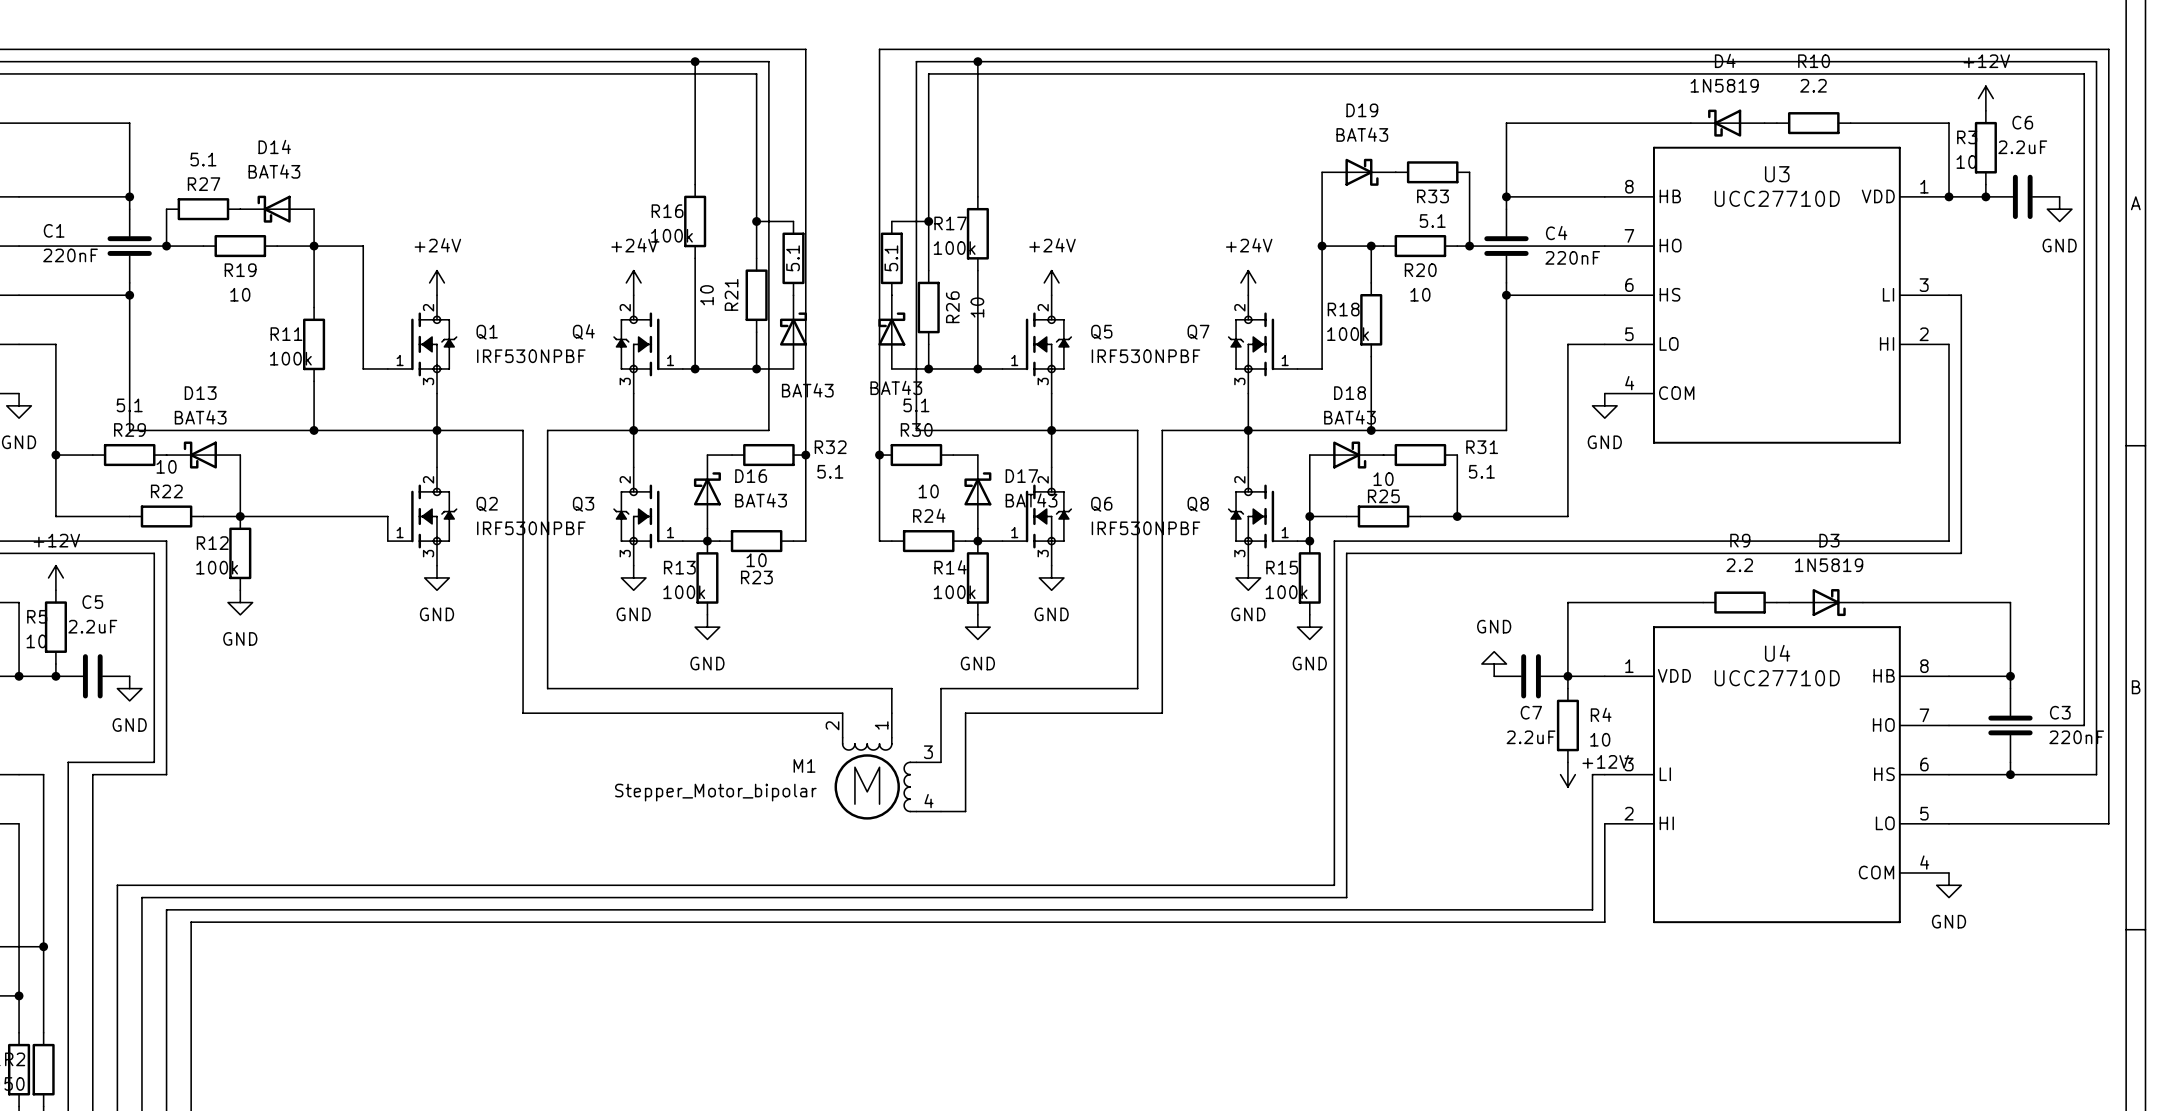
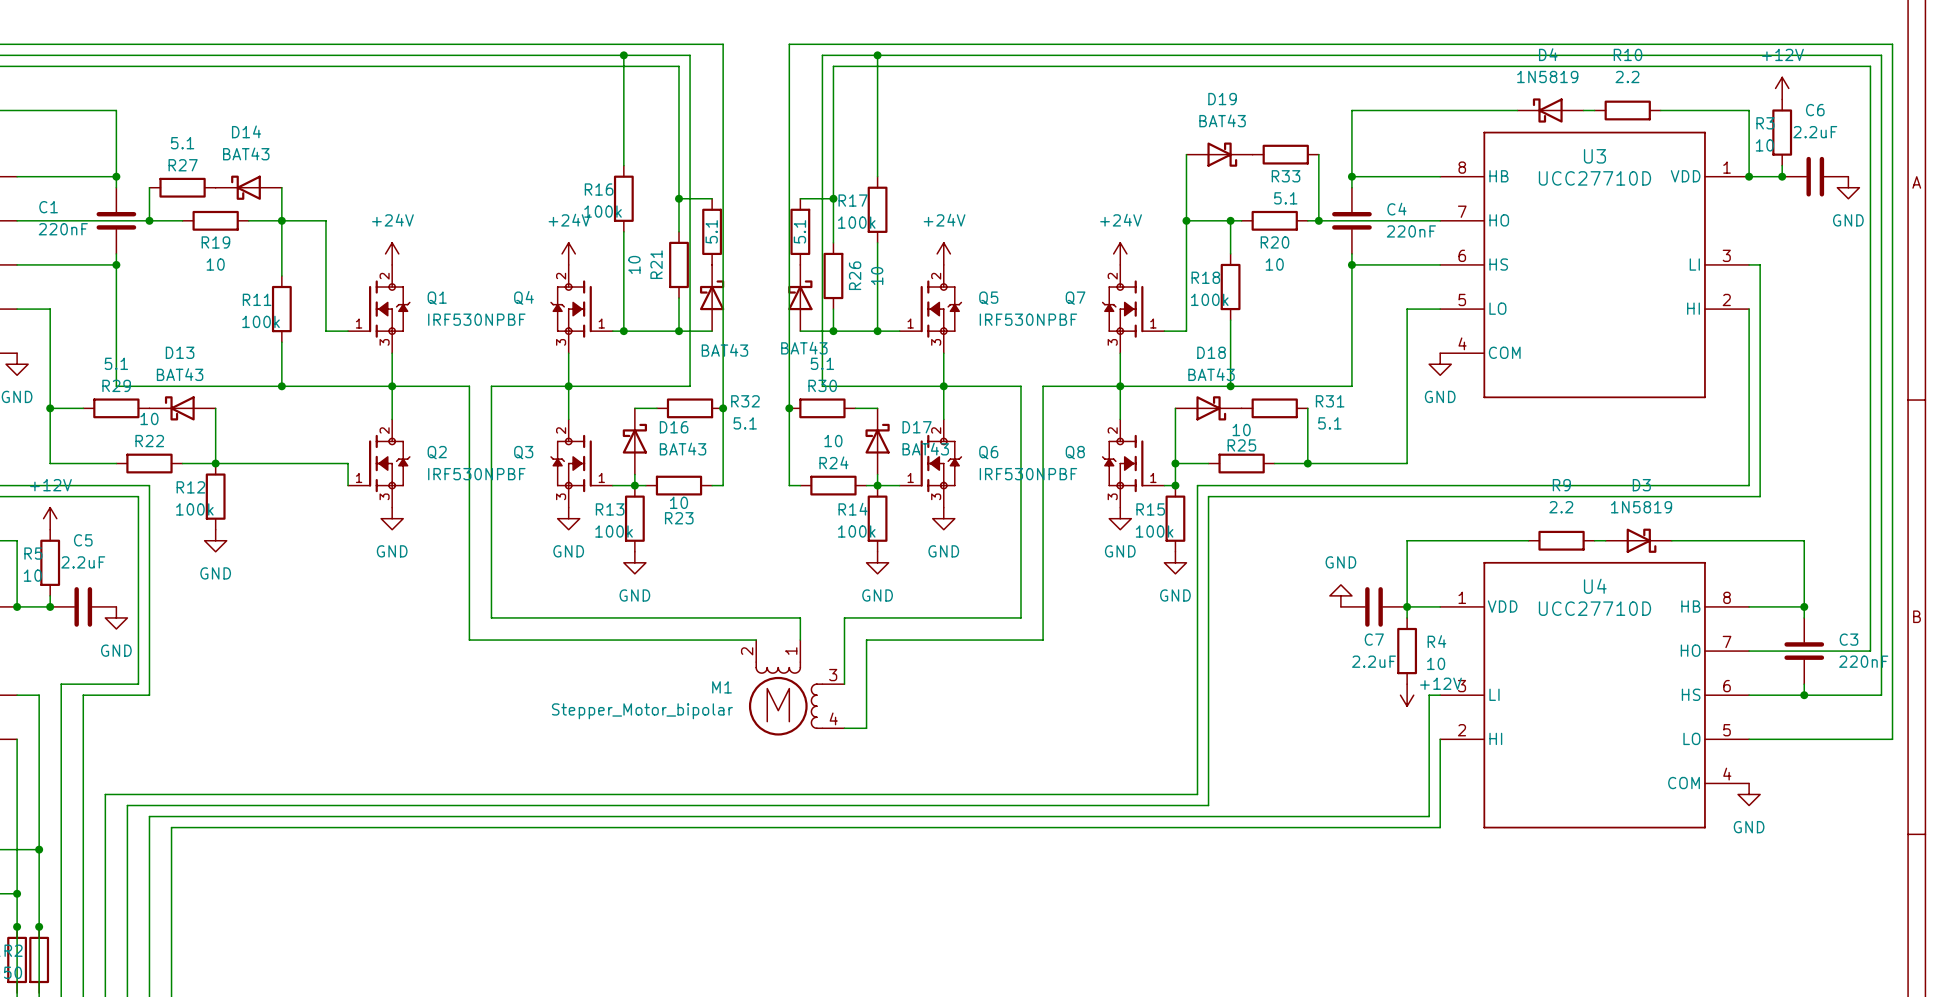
wire: none -> (17, 926) (17, 993)
junction: none -> (17, 926)
wire: none -> (39, 926) (39, 993)
junction: none -> (39, 926)

